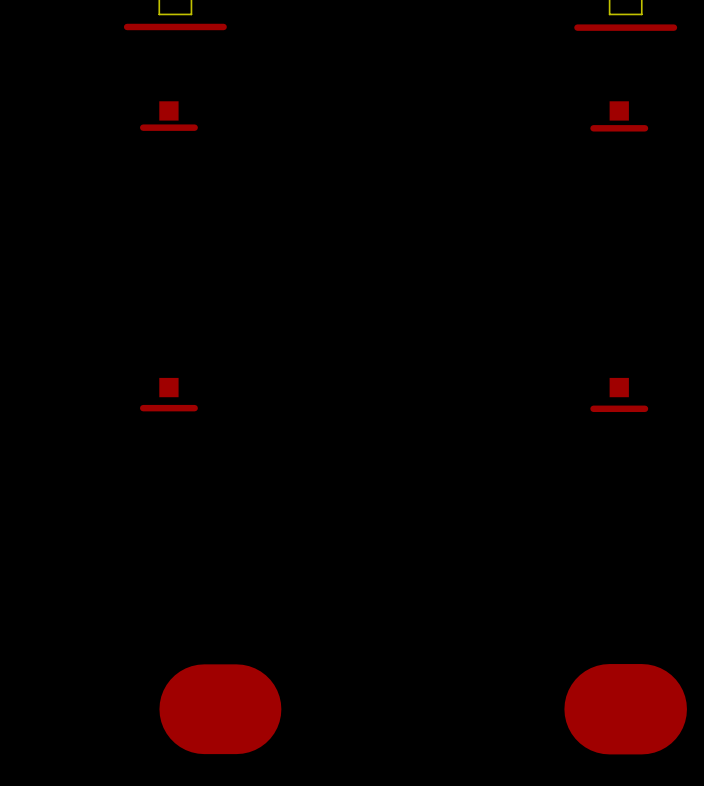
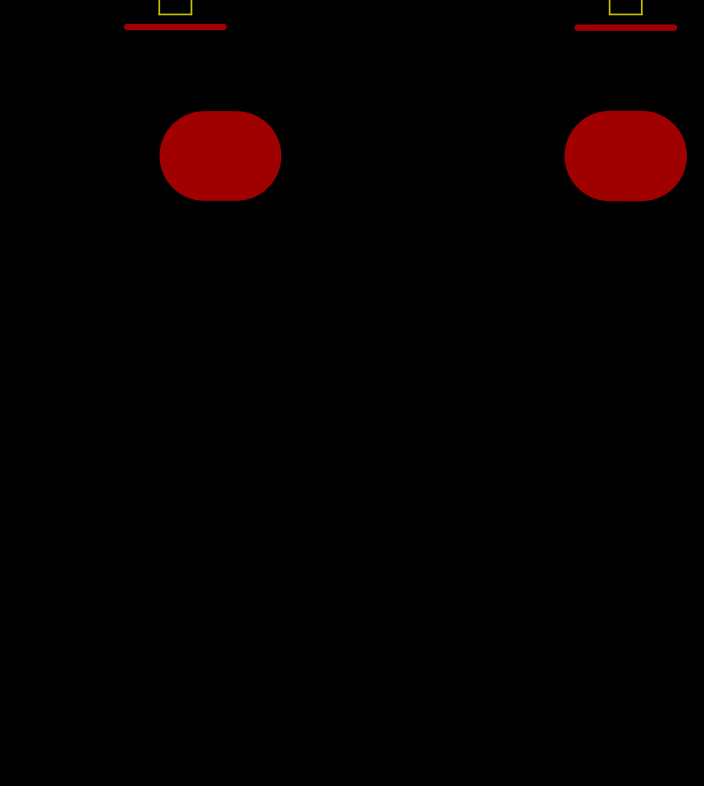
part: (168, 110) -> none
part: (619, 110) -> none
track: (143, 127) (194, 127) -> none
track: (593, 128) (644, 128) -> none
part: (168, 387) -> none
part: (619, 387) -> none
track: (143, 408) (194, 408) -> none
track: (593, 408) (644, 408) -> none
track: (204, 709) (236, 709) -> (204, 155) (236, 155)
track: (609, 709) (641, 709) -> (609, 155) (641, 155)

